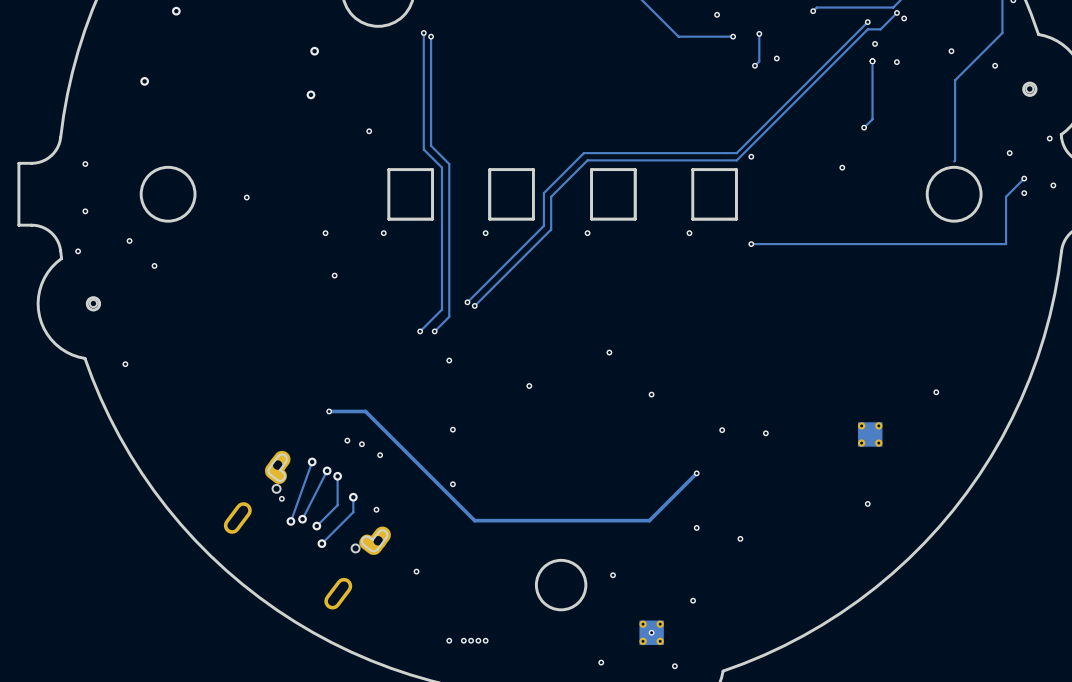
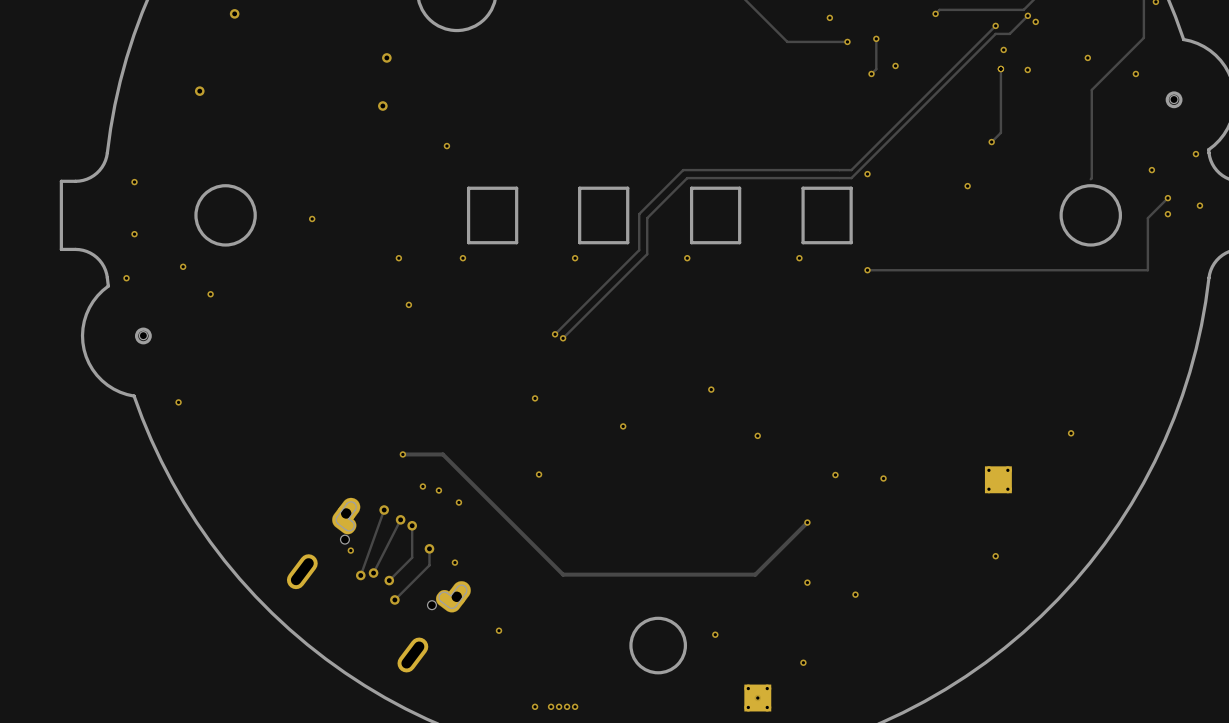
track: (423, 33) (423, 149) (441, 167) (441, 309) (420, 331) -> none
via: (423, 33) -> none
track: (431, 36) (431, 145) (449, 164) (449, 316) (434, 331) -> none
via: (431, 36) -> none
via: (420, 331) -> none
via: (434, 331) -> none
via: (452, 484) -> none

